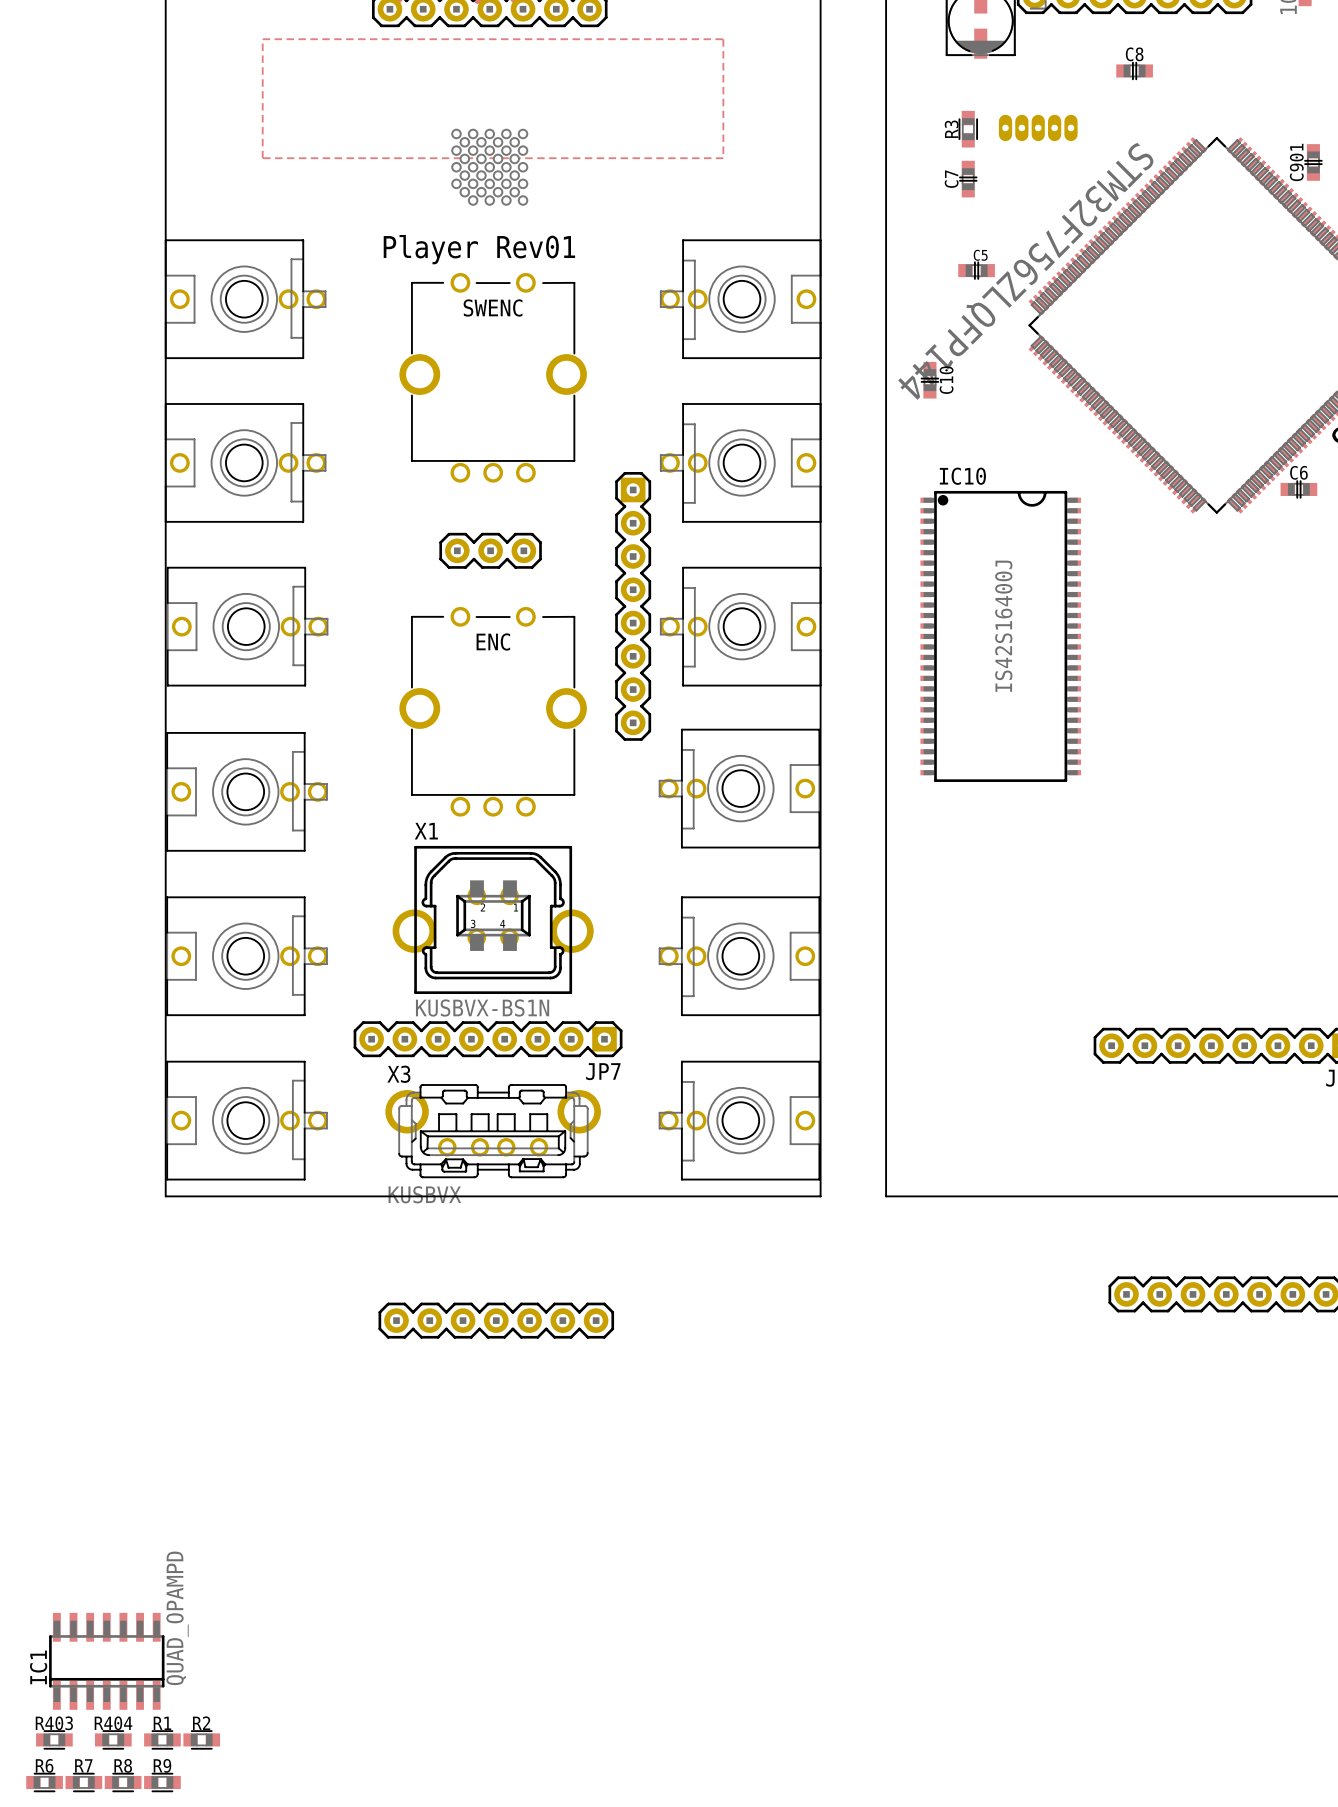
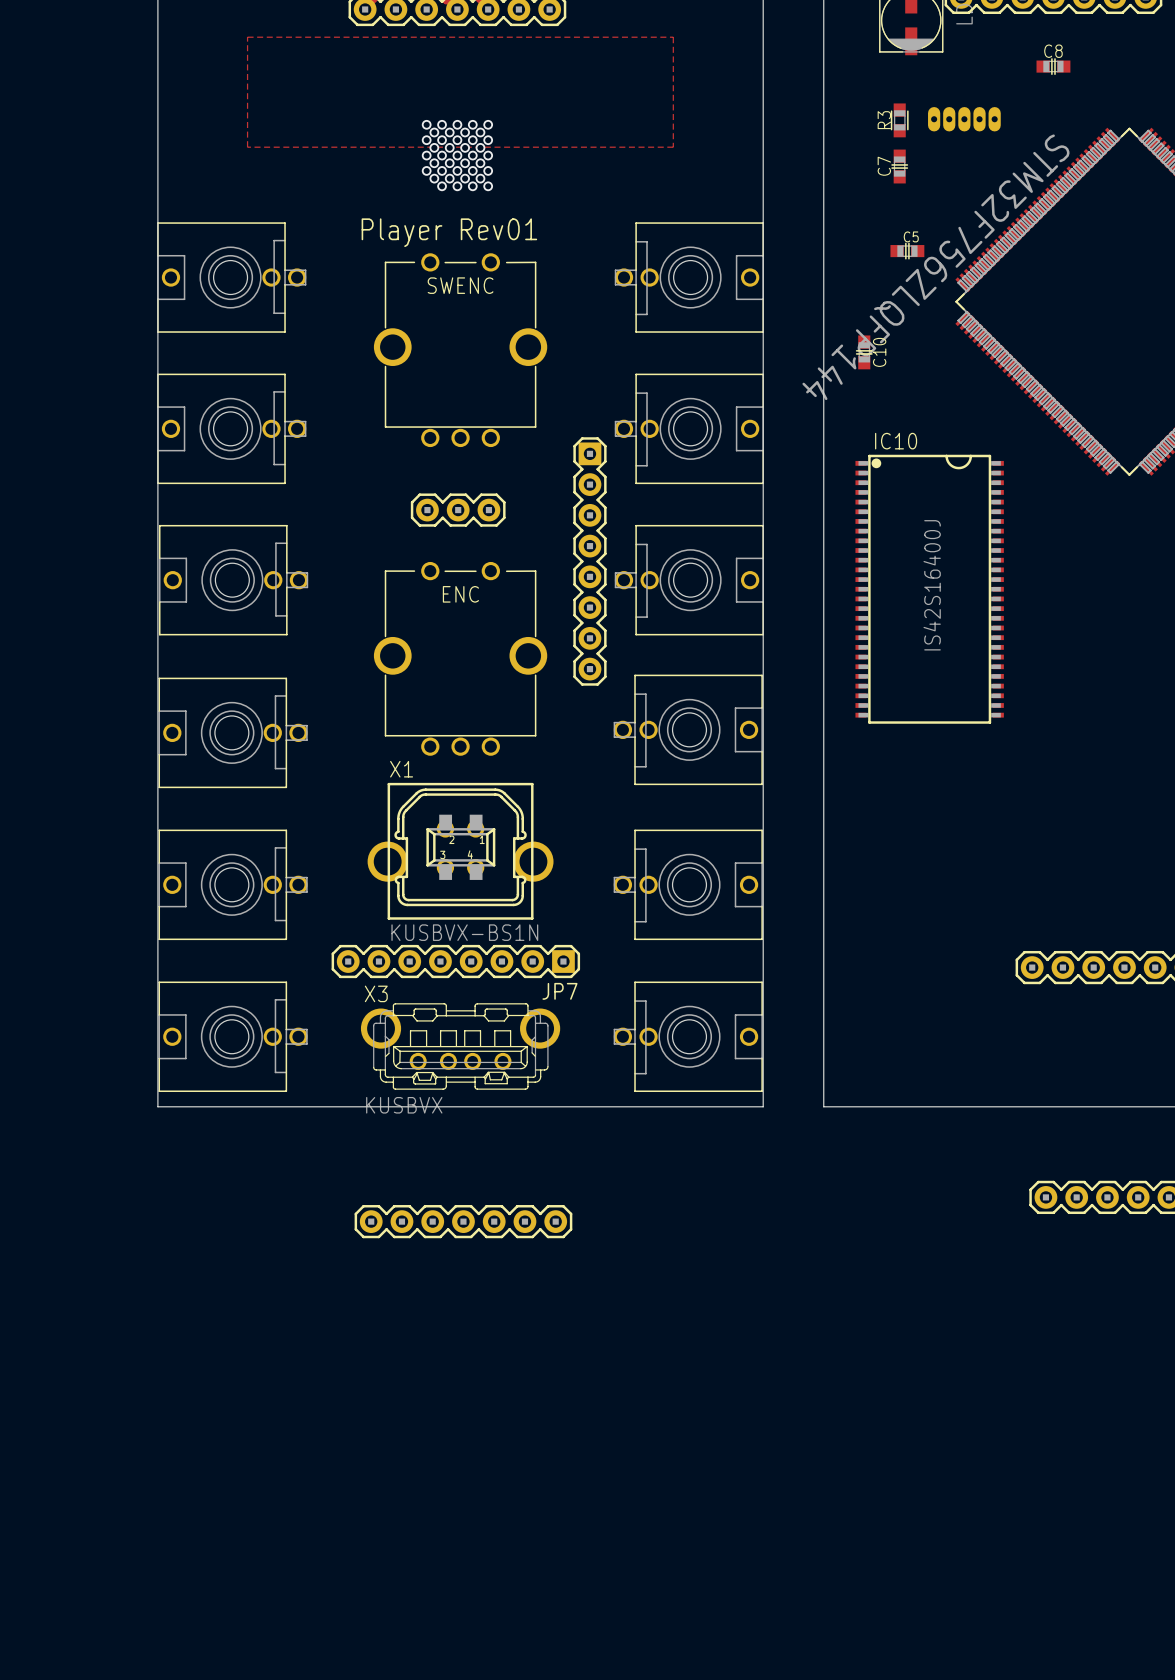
IC1: QUAD_OPAMPD (106, 1661) -> none
R403: (54, 1739) -> none
R404: (113, 1739) -> none
R1: (162, 1739) -> none
R2: (201, 1739) -> none
R6: (44, 1782) -> none
R7: (83, 1782) -> none
R8: (123, 1782) -> none
R9: (162, 1782) -> none

